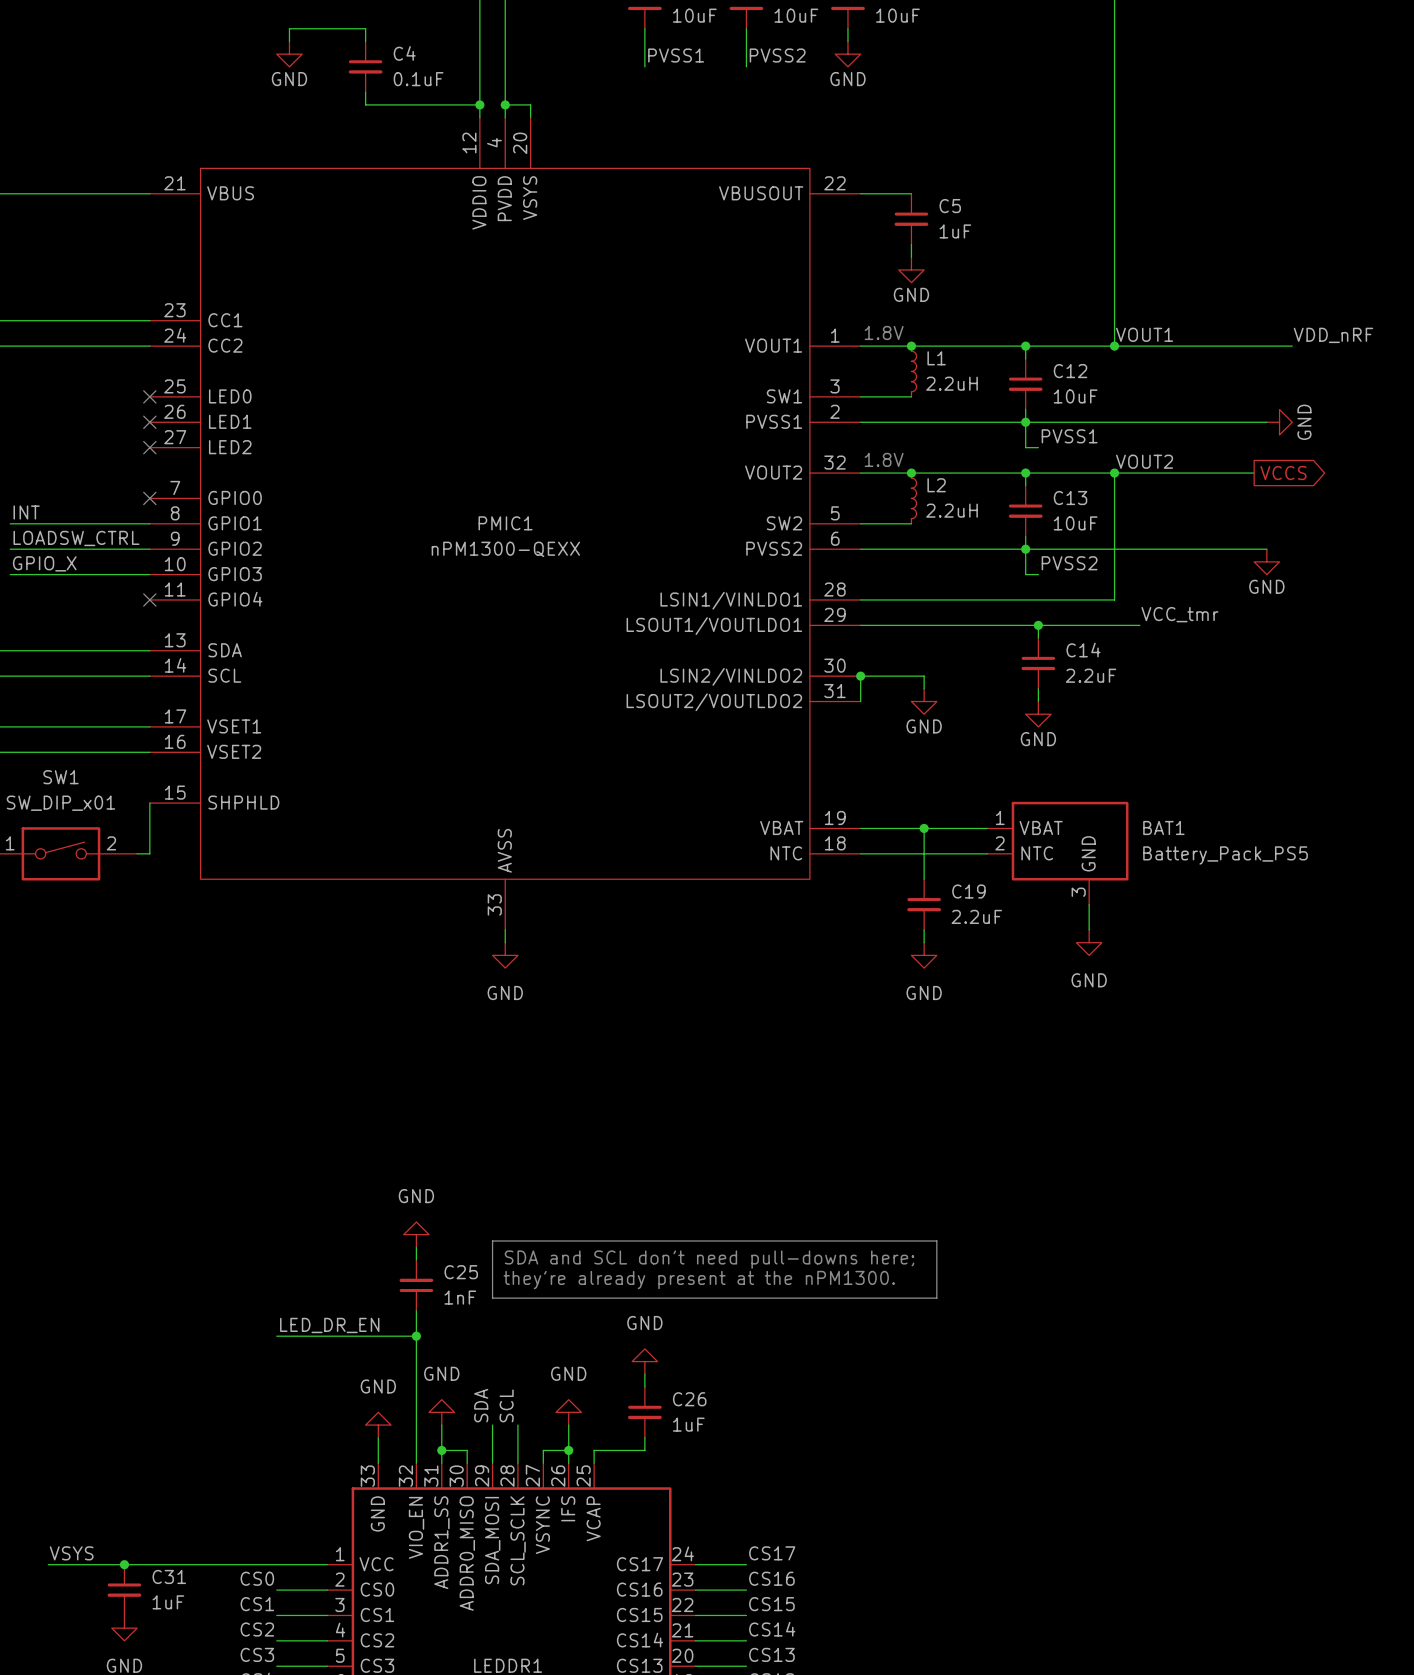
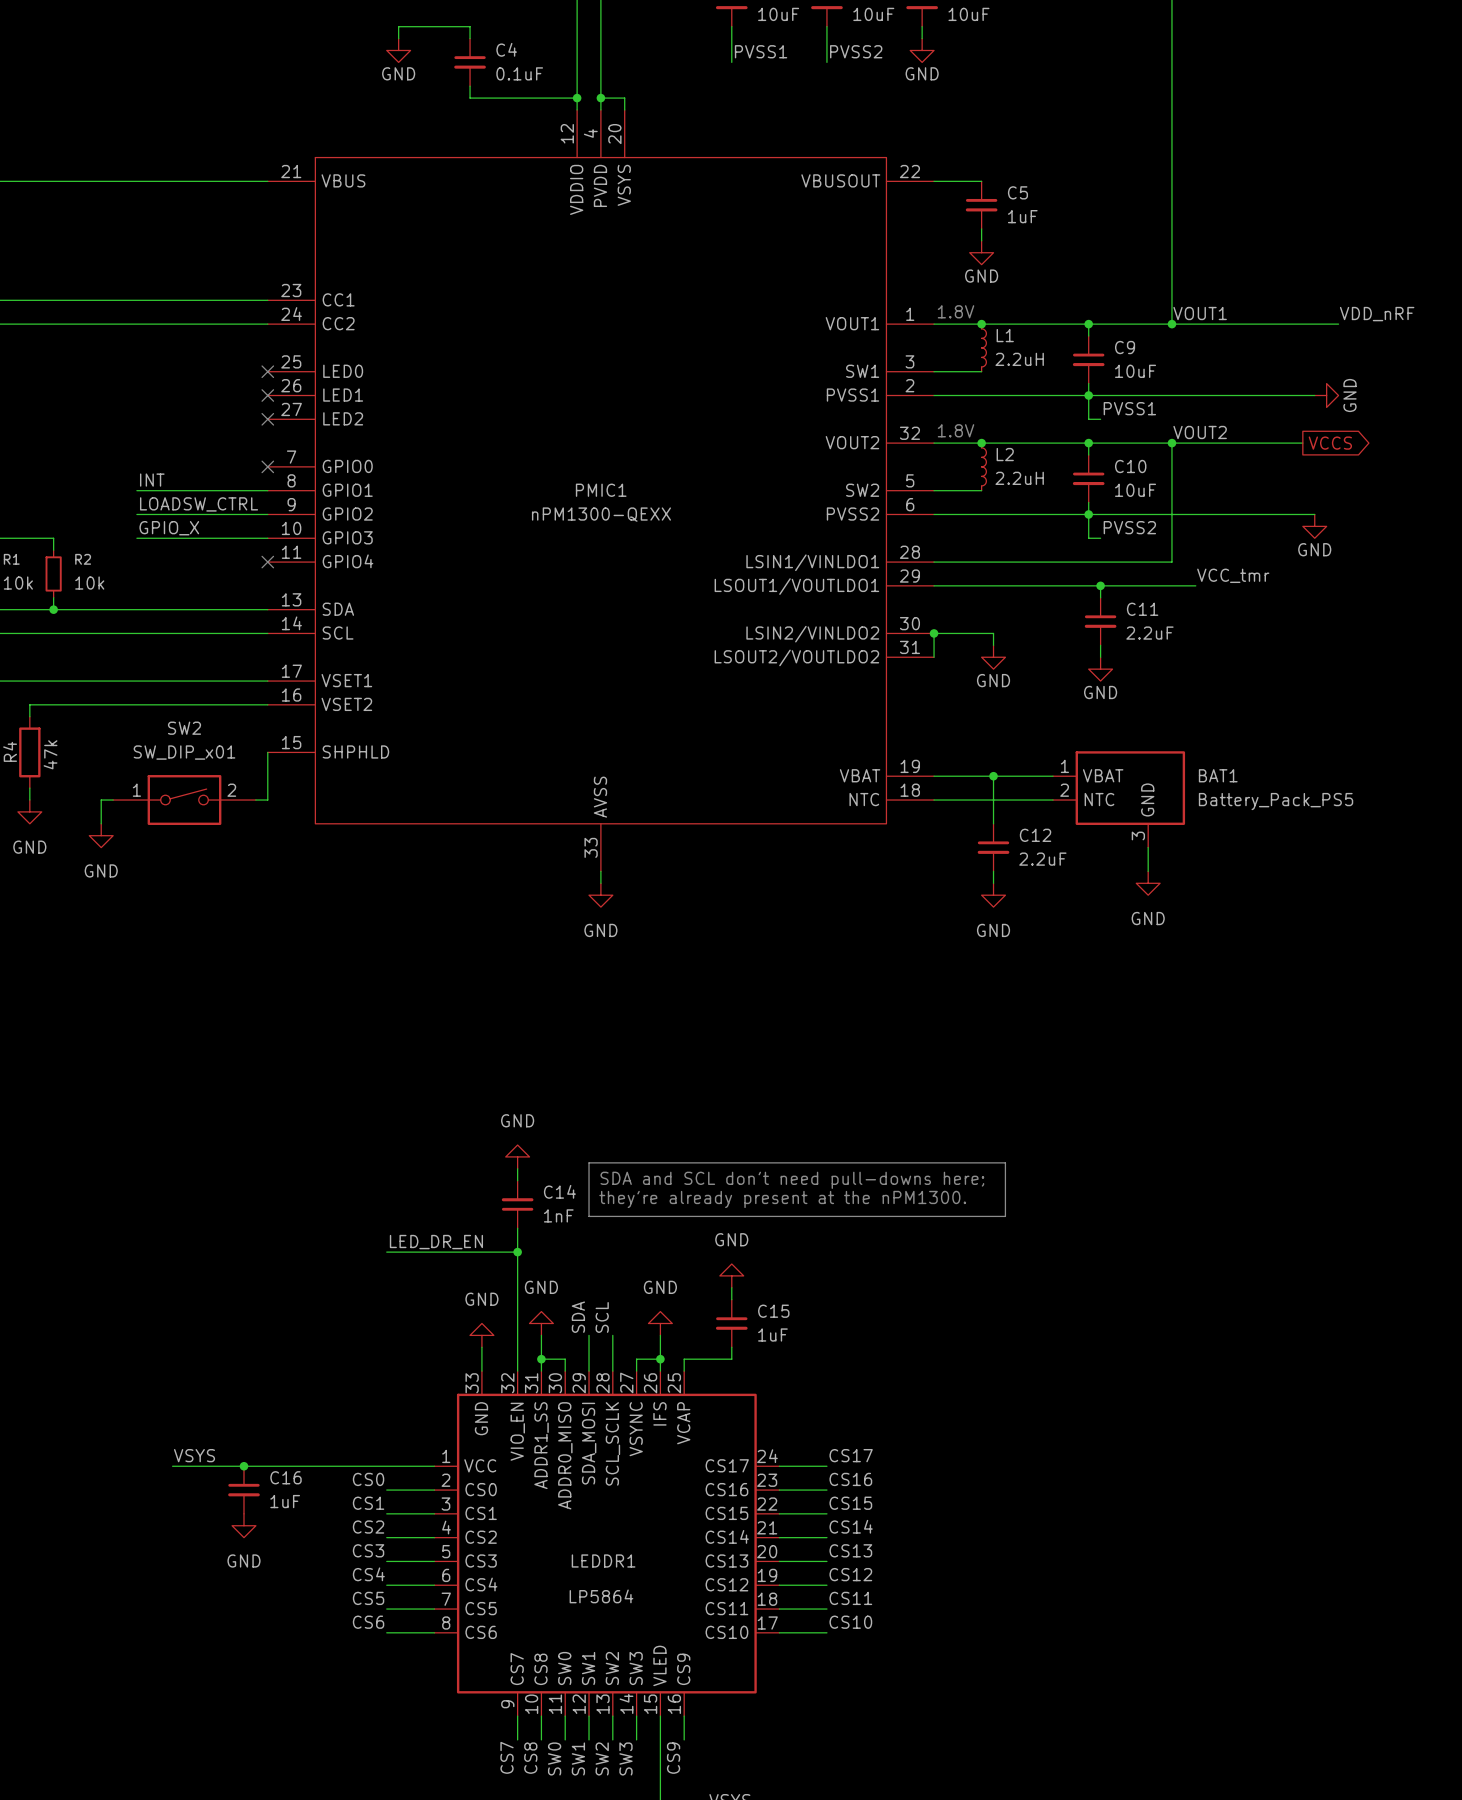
C12 name: C12 (1070, 371) -> C9 (1125, 347)
C13 name: C13 (1070, 498) -> C10 (1130, 466)
C14 name: C14 (1083, 650) -> C11 (1142, 609)
SW1 name: SW1 (60, 777) -> SW2 (184, 728)
C19 name: C19 (968, 891) -> C12 (1035, 835)
C25 name: C25 (461, 1272) -> C14 (559, 1191)
C26 name: C26 (689, 1399) -> C15 (773, 1311)
C31 name: C31 (169, 1576) -> C16 (286, 1477)

